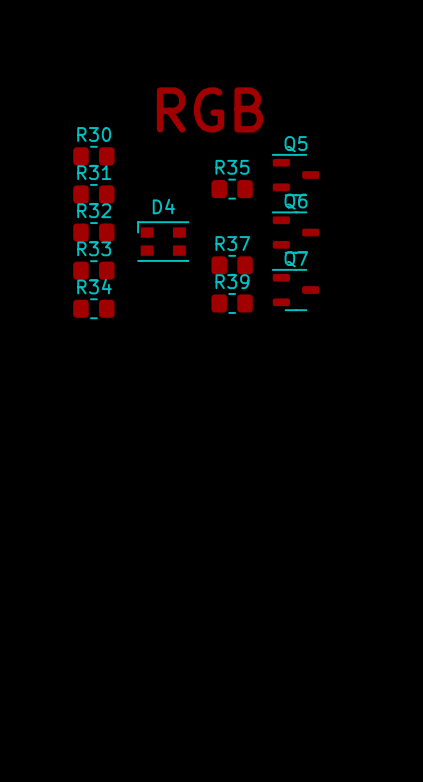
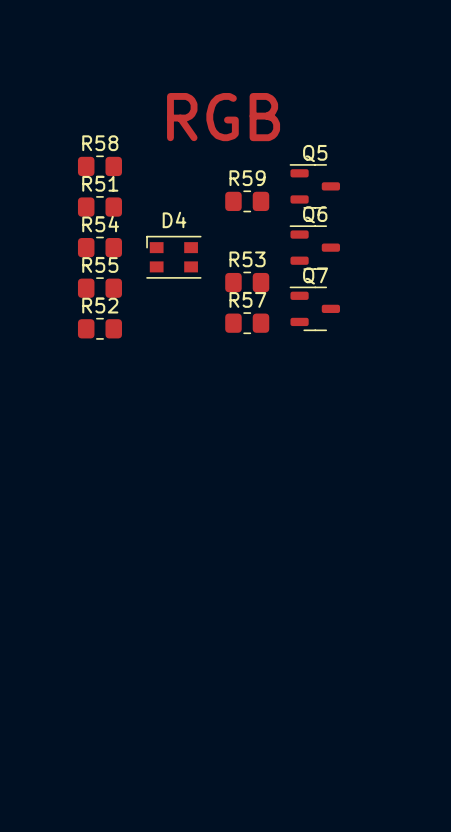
R30 name: R30 (94, 134) -> R58 (100, 143)
R35 name: R35 (232, 167) -> R59 (247, 178)
R31 name: R31 (94, 172) -> R51 (100, 183)
R32 name: R32 (94, 210) -> R54 (100, 224)
R37 name: R37 (232, 243) -> R53 (247, 259)
R33 name: R33 (94, 248) -> R55 (100, 265)
R39 name: R39 (232, 281) -> R57 (247, 299)
R34 name: R34 (94, 286) -> R52 (100, 305)

